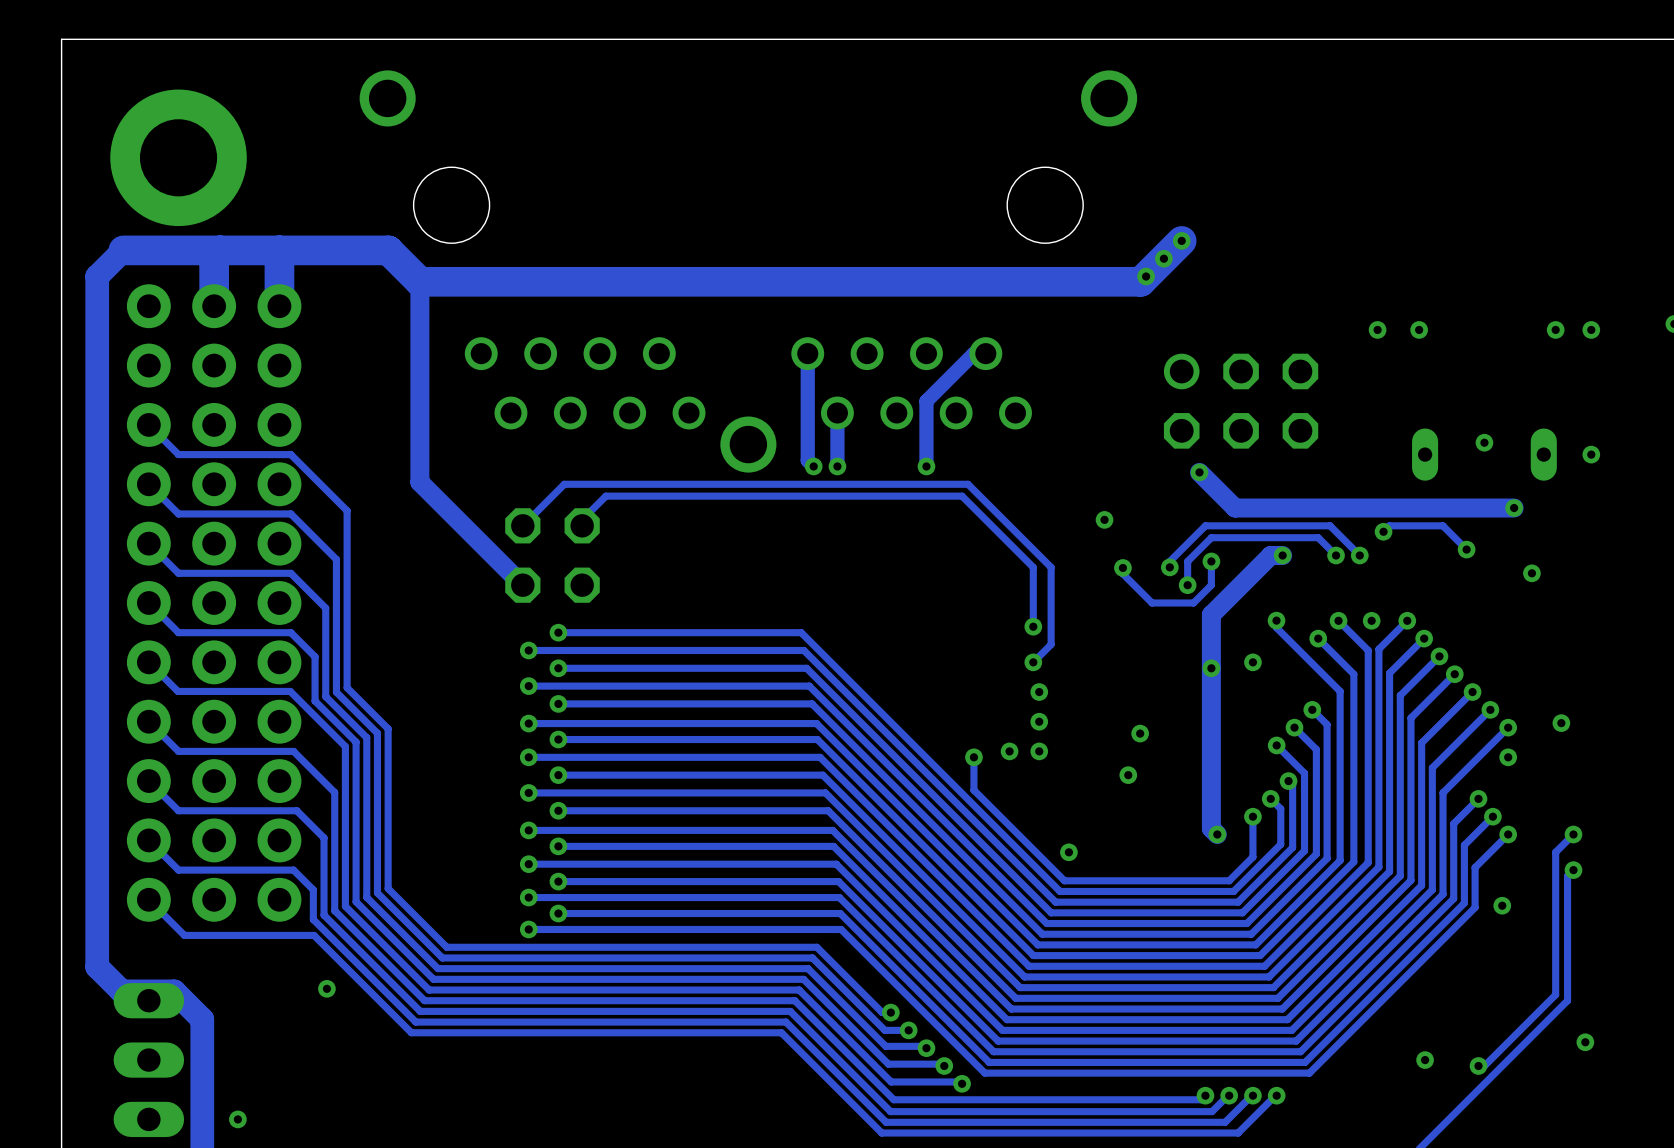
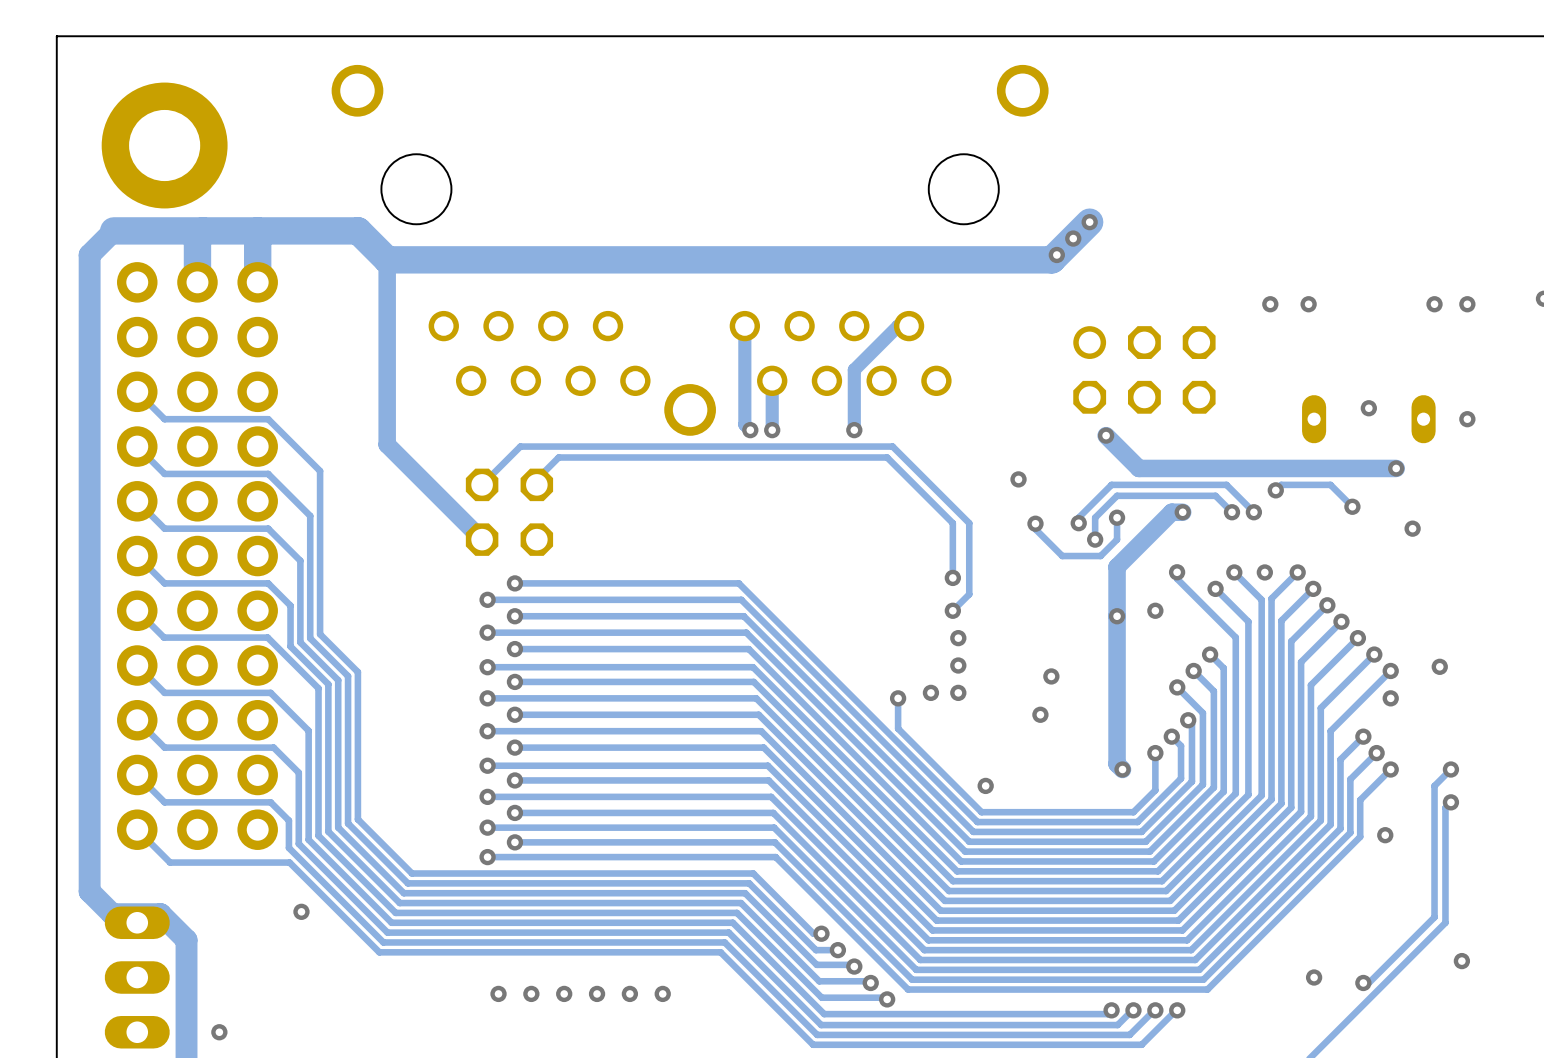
via: none -> (498, 993)
via: none -> (531, 993)
via: none -> (564, 993)
via: none -> (597, 993)
via: none -> (629, 993)
via: none -> (662, 993)

